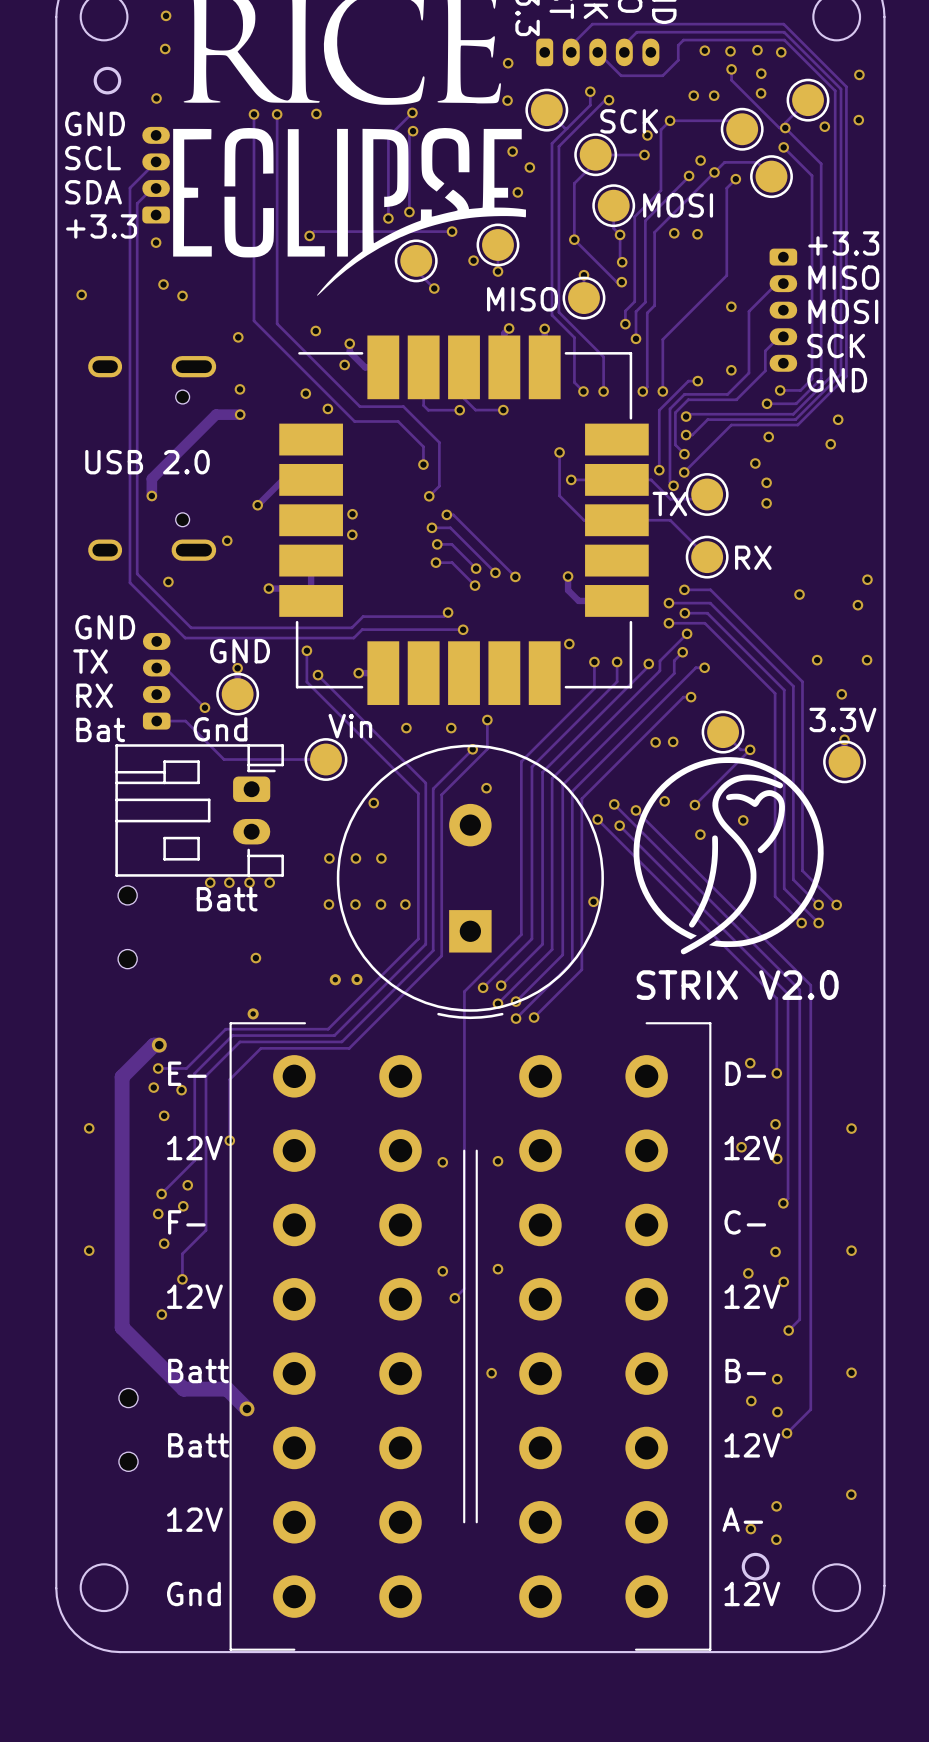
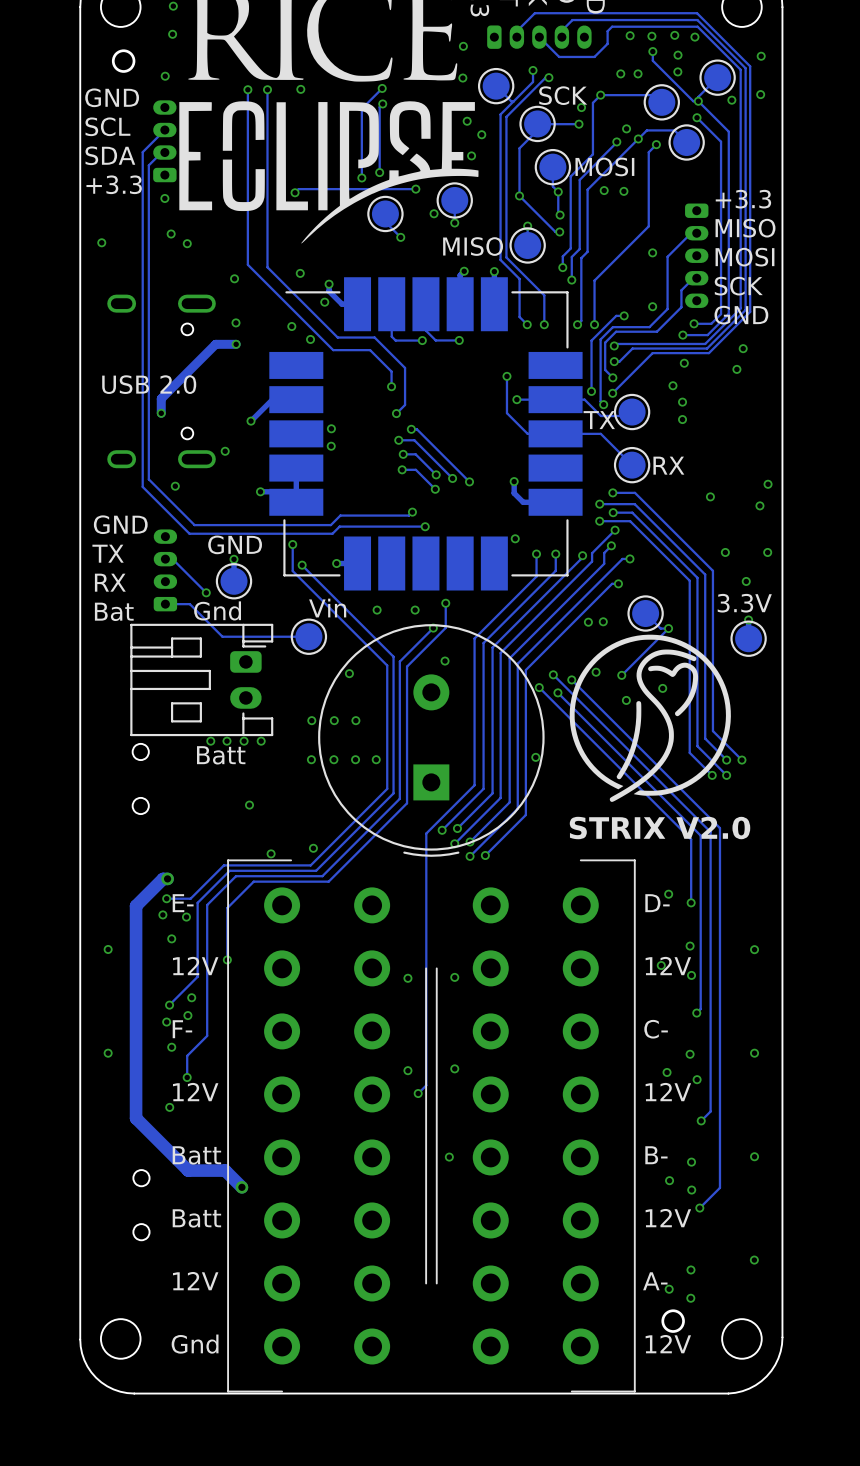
via: (335, 979) -> none
via: (356, 979) -> none
via: none -> (313, 848)
via: (253, 1013) -> none
via: none -> (271, 853)

